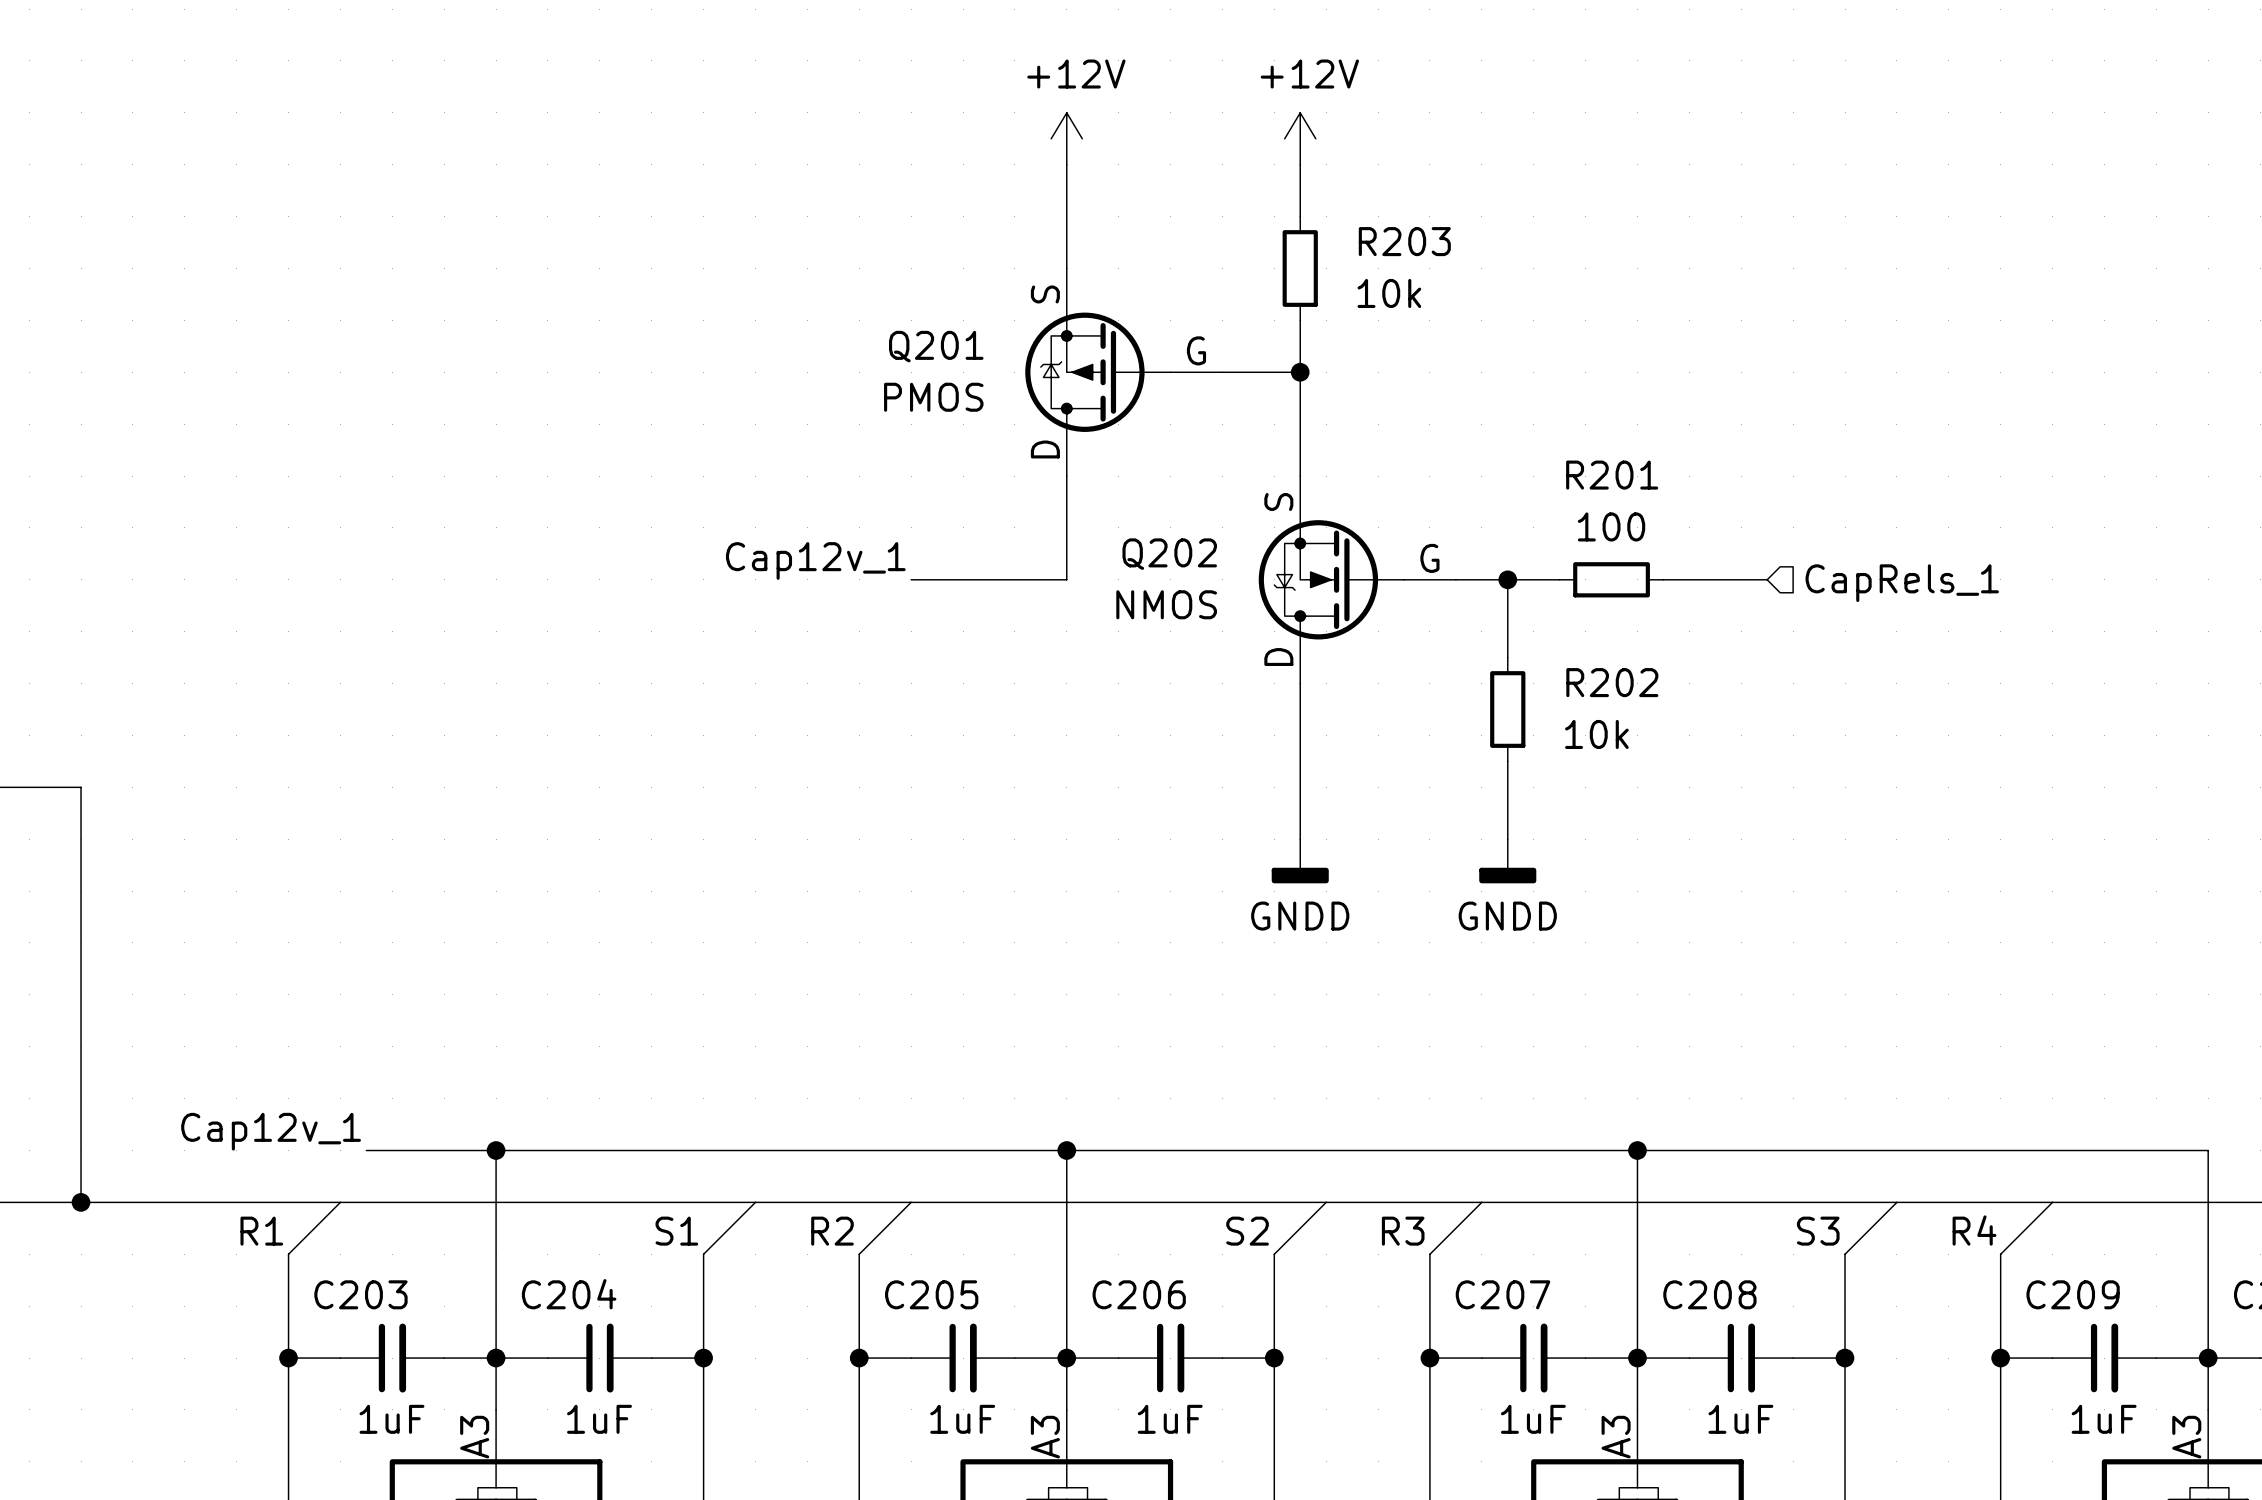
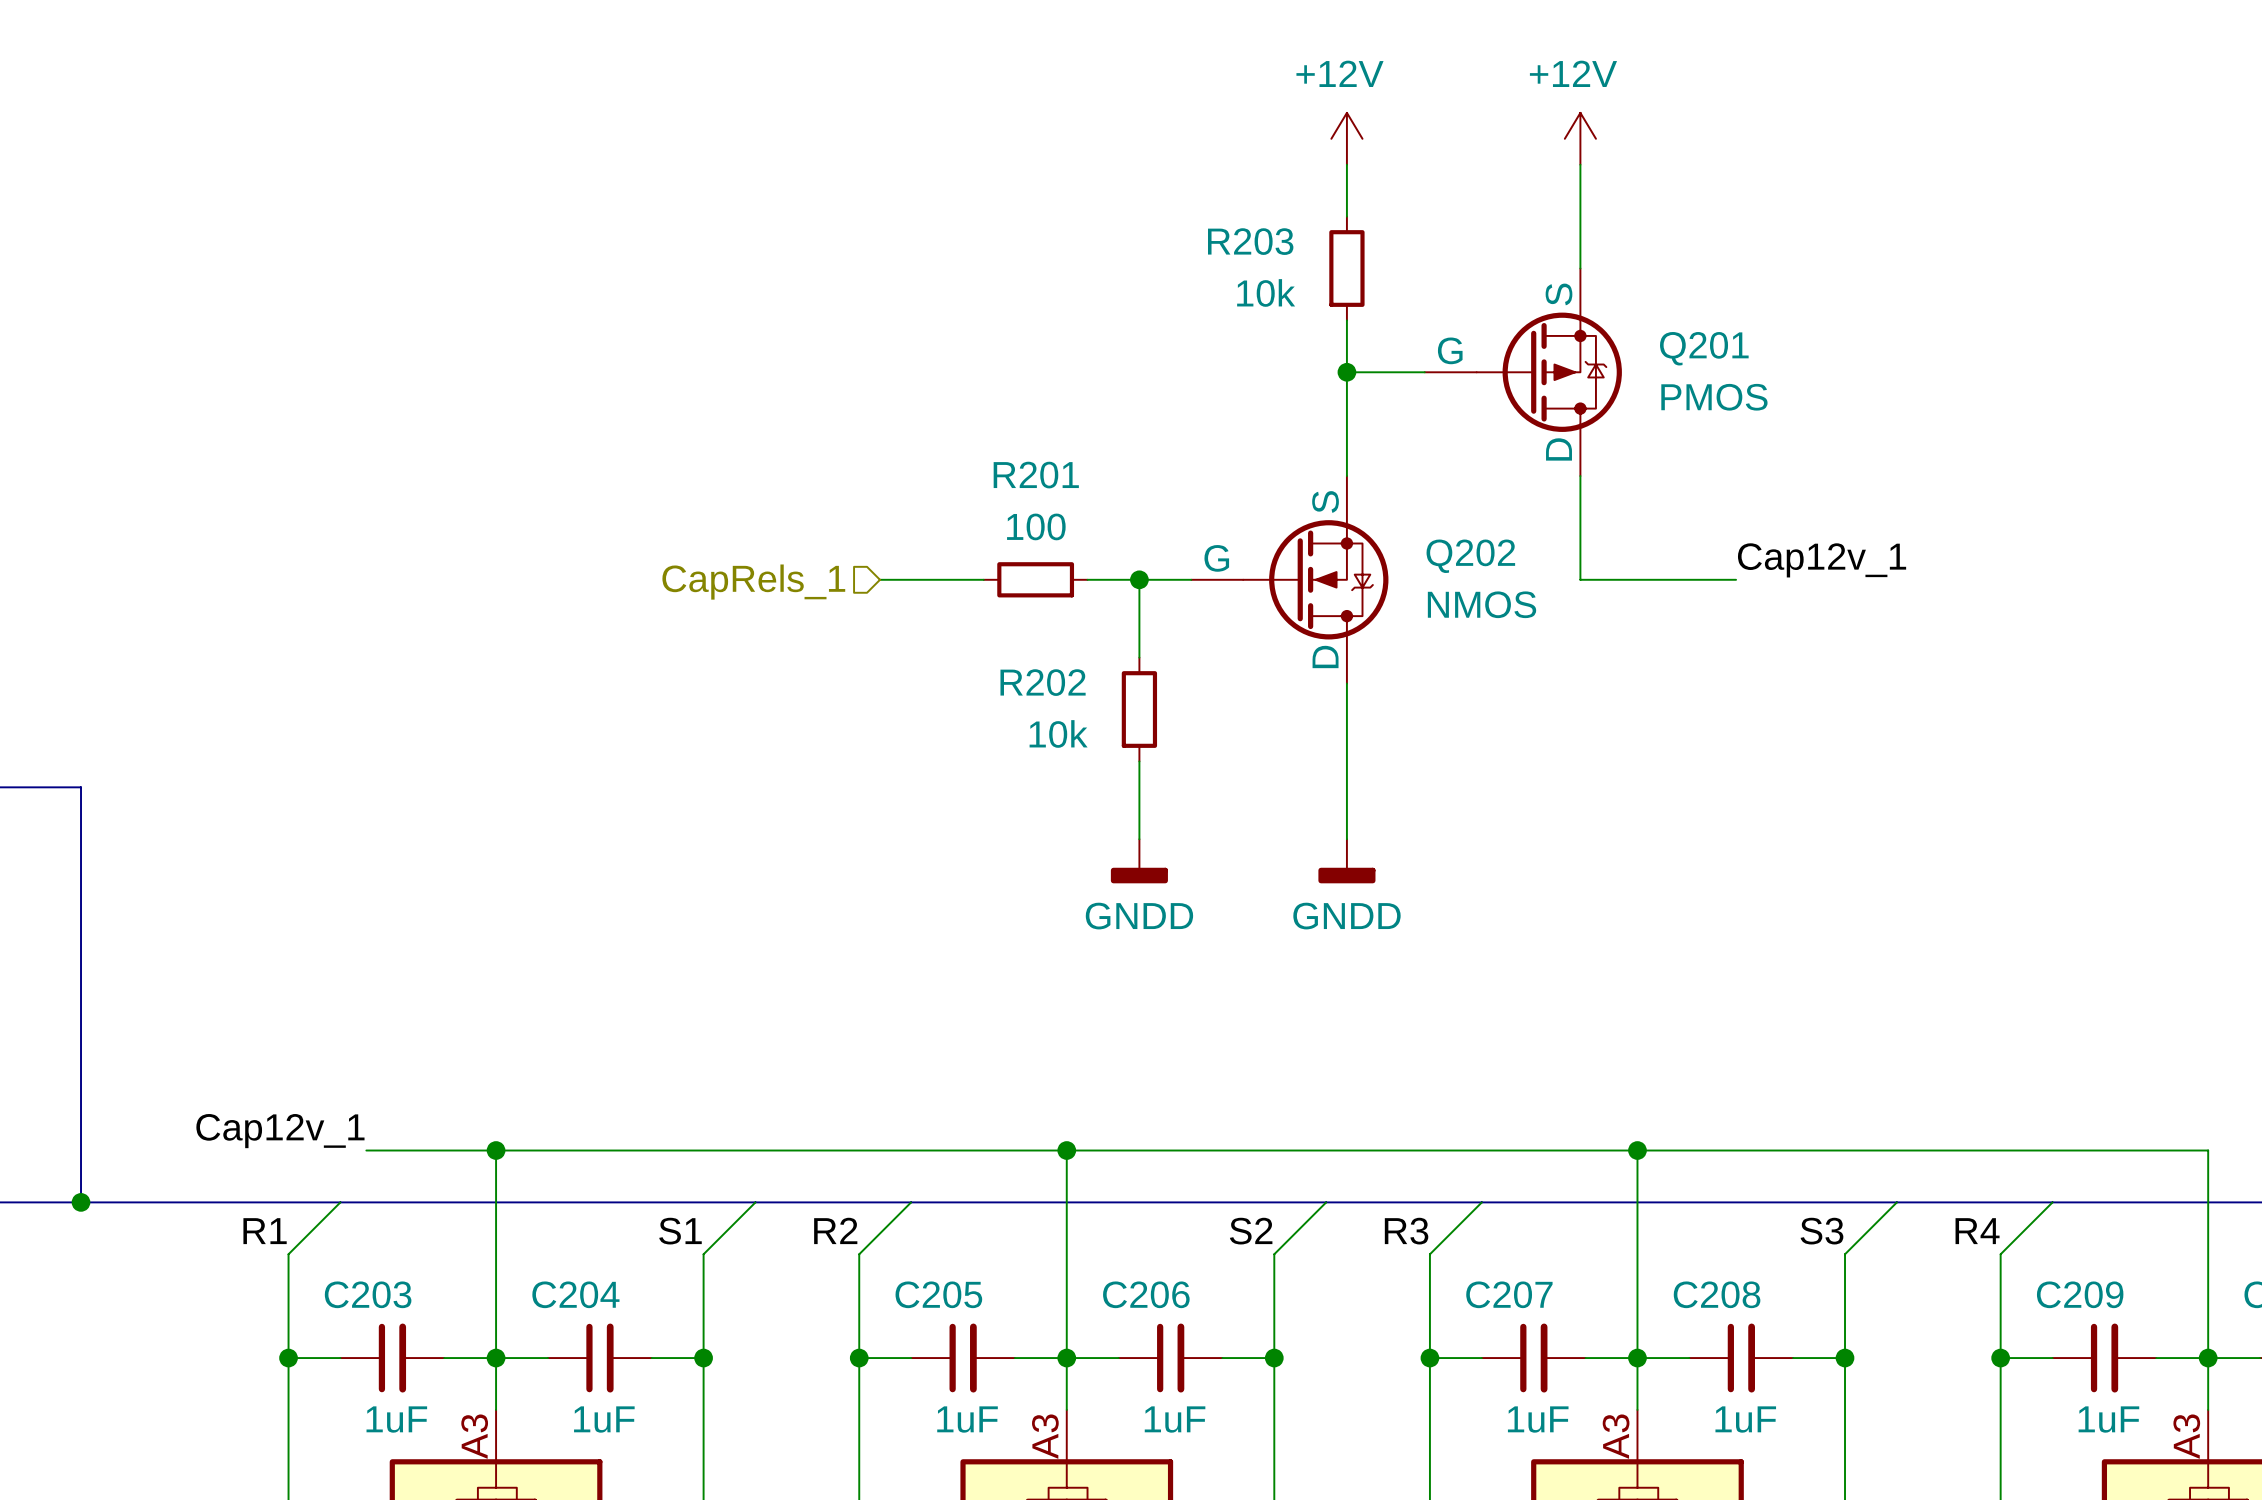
power symbol text position: +12V (1309, 74) -> +12V (1339, 73)
power symbol: +12V (1066, 138) -> none
power symbol position: +12V (1300, 138) -> +12V (1346, 138)
power symbol: none -> +12V (1580, 138)
wire: (1066, 164) (1066, 268) -> none
wire: (1300, 164) (1300, 216) -> (1346, 164) (1346, 216)
wire: none -> (1580, 164) (1580, 268)
R203 name position: R203 (1404, 241) -> R203 (1250, 241)
R203 position: (1300, 268) -> (1346, 268)
R203 value position: 10k (1389, 293) -> 10k (1266, 292)
wire: (1300, 320) (1300, 476) -> (1346, 320) (1346, 476)
Q201 flip: as is (1097, 372) -> left-right (1549, 372)
Q201 position: (1123, 372) -> (1523, 372)
wire: (1222, 372) (1300, 372) -> (1346, 372) (1424, 372)
junction position: (1300, 372) -> (1346, 372)
wire: (1066, 476) (1066, 579) (983, 579) -> none
wire: none -> (1580, 476) (1580, 579) (1663, 579)
label: Cap12v_1 (815, 560) -> none
label: none -> Cap12v_1 (1822, 560)
wire: none -> (879, 579) (911, 579)
junction: none -> (1139, 579)
Q202 flip: as is (1331, 579) -> left-right (1315, 579)
wire: (1455, 579) (1559, 579) -> (1087, 579) (1191, 579)
wire: (1507, 579) (1507, 657) -> (1139, 579) (1139, 657)
junction: (1507, 579) -> none
R201 position: (1611, 579) -> (1035, 579)
wire: (1736, 579) (1767, 579) -> none
hierarchical label: none -> CapRels_1 (753, 582)
hierarchical label: CapRels_1 (1902, 583) -> none
R202 name position: R202 (1612, 682) -> R202 (1043, 682)
wire: (1300, 683) (1300, 839) -> (1346, 683) (1346, 839)
R202 position: (1507, 709) -> (1139, 709)
R202 value position: 10k (1596, 734) -> 10k (1058, 733)
wire: (1507, 761) (1507, 839) -> (1139, 761) (1139, 839)
power symbol: none -> GNDD (1139, 861)
power symbol position: GNDD (1300, 861) -> GNDD (1346, 861)
power symbol: GNDD (1507, 861) -> none

